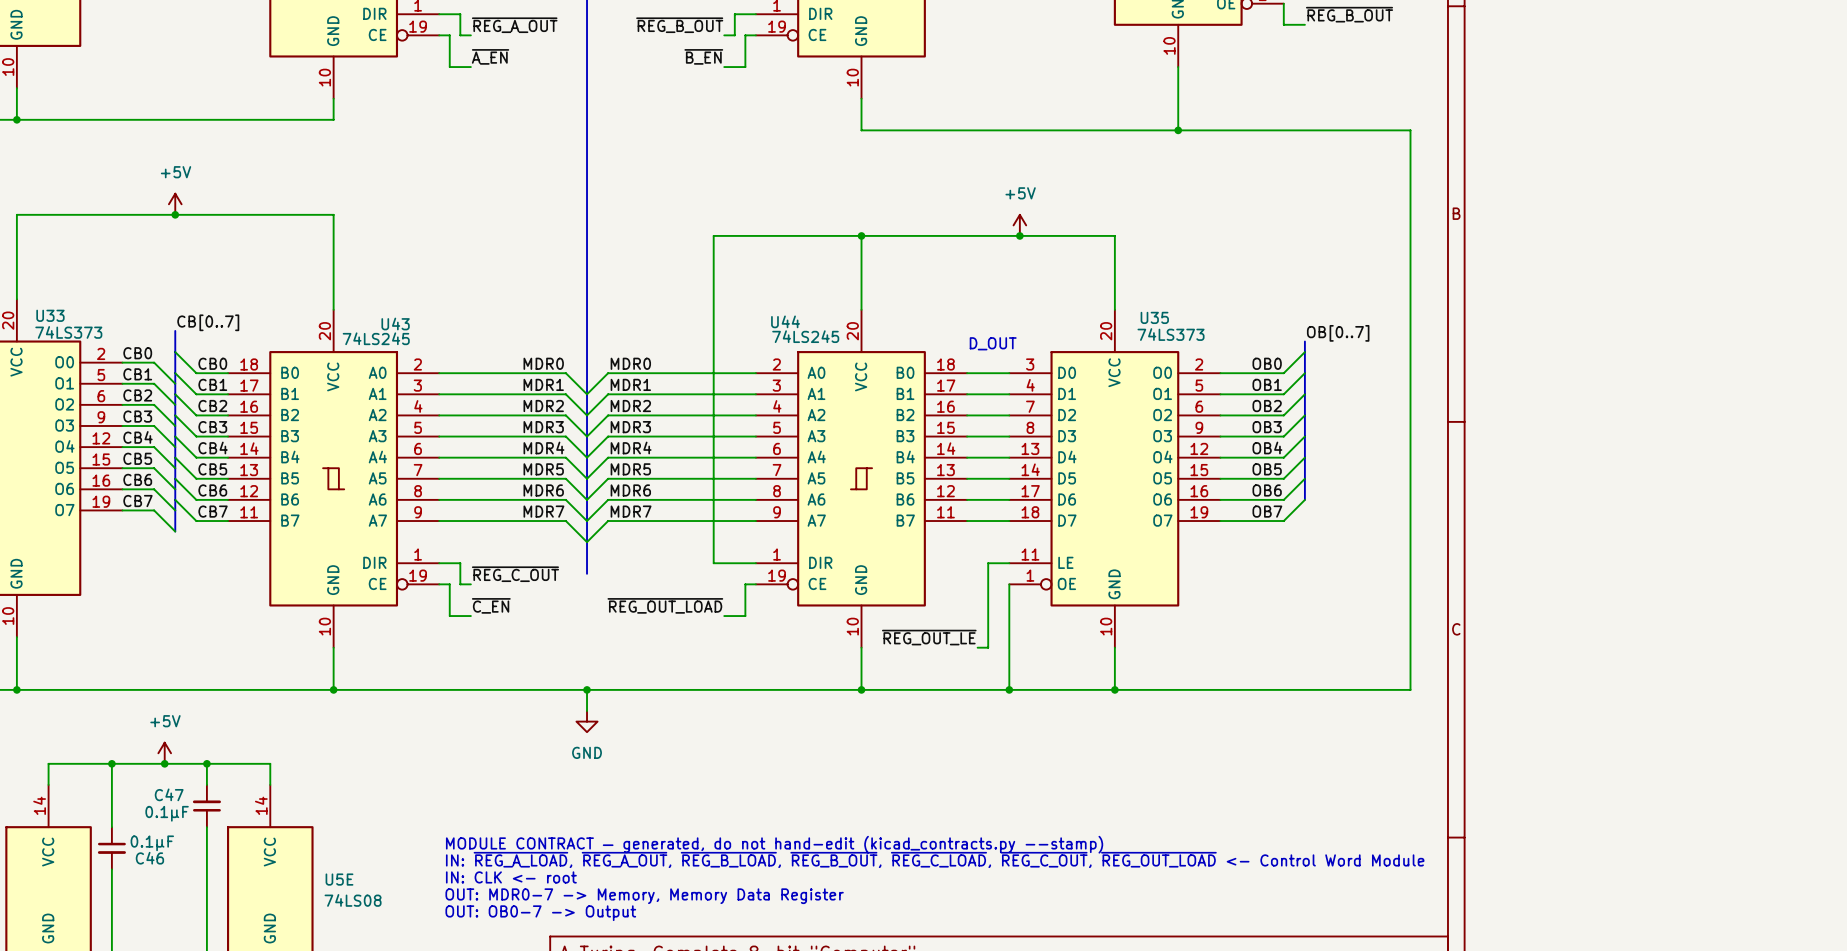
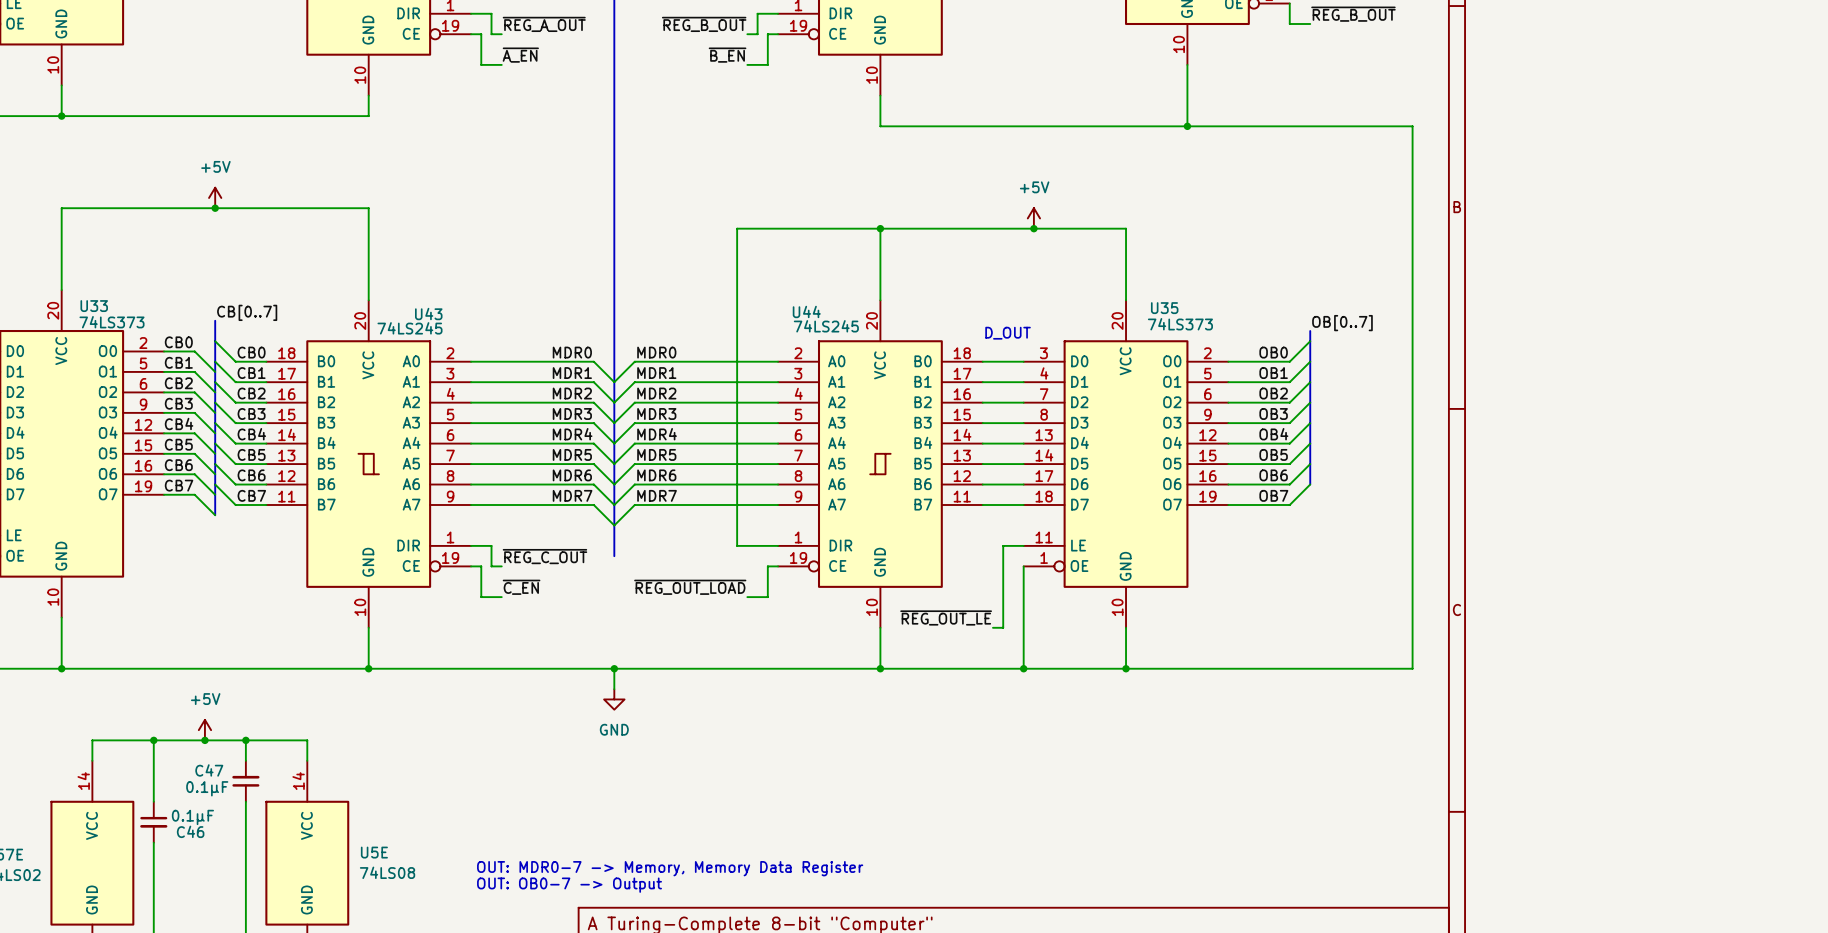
text: MODULE CONTRACT — generated, do not hand-edit (kicad_contracts.py --stamp) (774, 844) -> none
text: IN: ~{REG_A_LOAD}, ~{REG_A_OUT}, ~{REG_B_LOAD}, ~{REG_B_OUT}, ~{REG_C_LOAD}, ~{REG_C_OUT}, ~{REG_OUT_LOAD} <- Control Word Module (935, 859) -> none
text: IN: CLK <- root (511, 877) -> none

